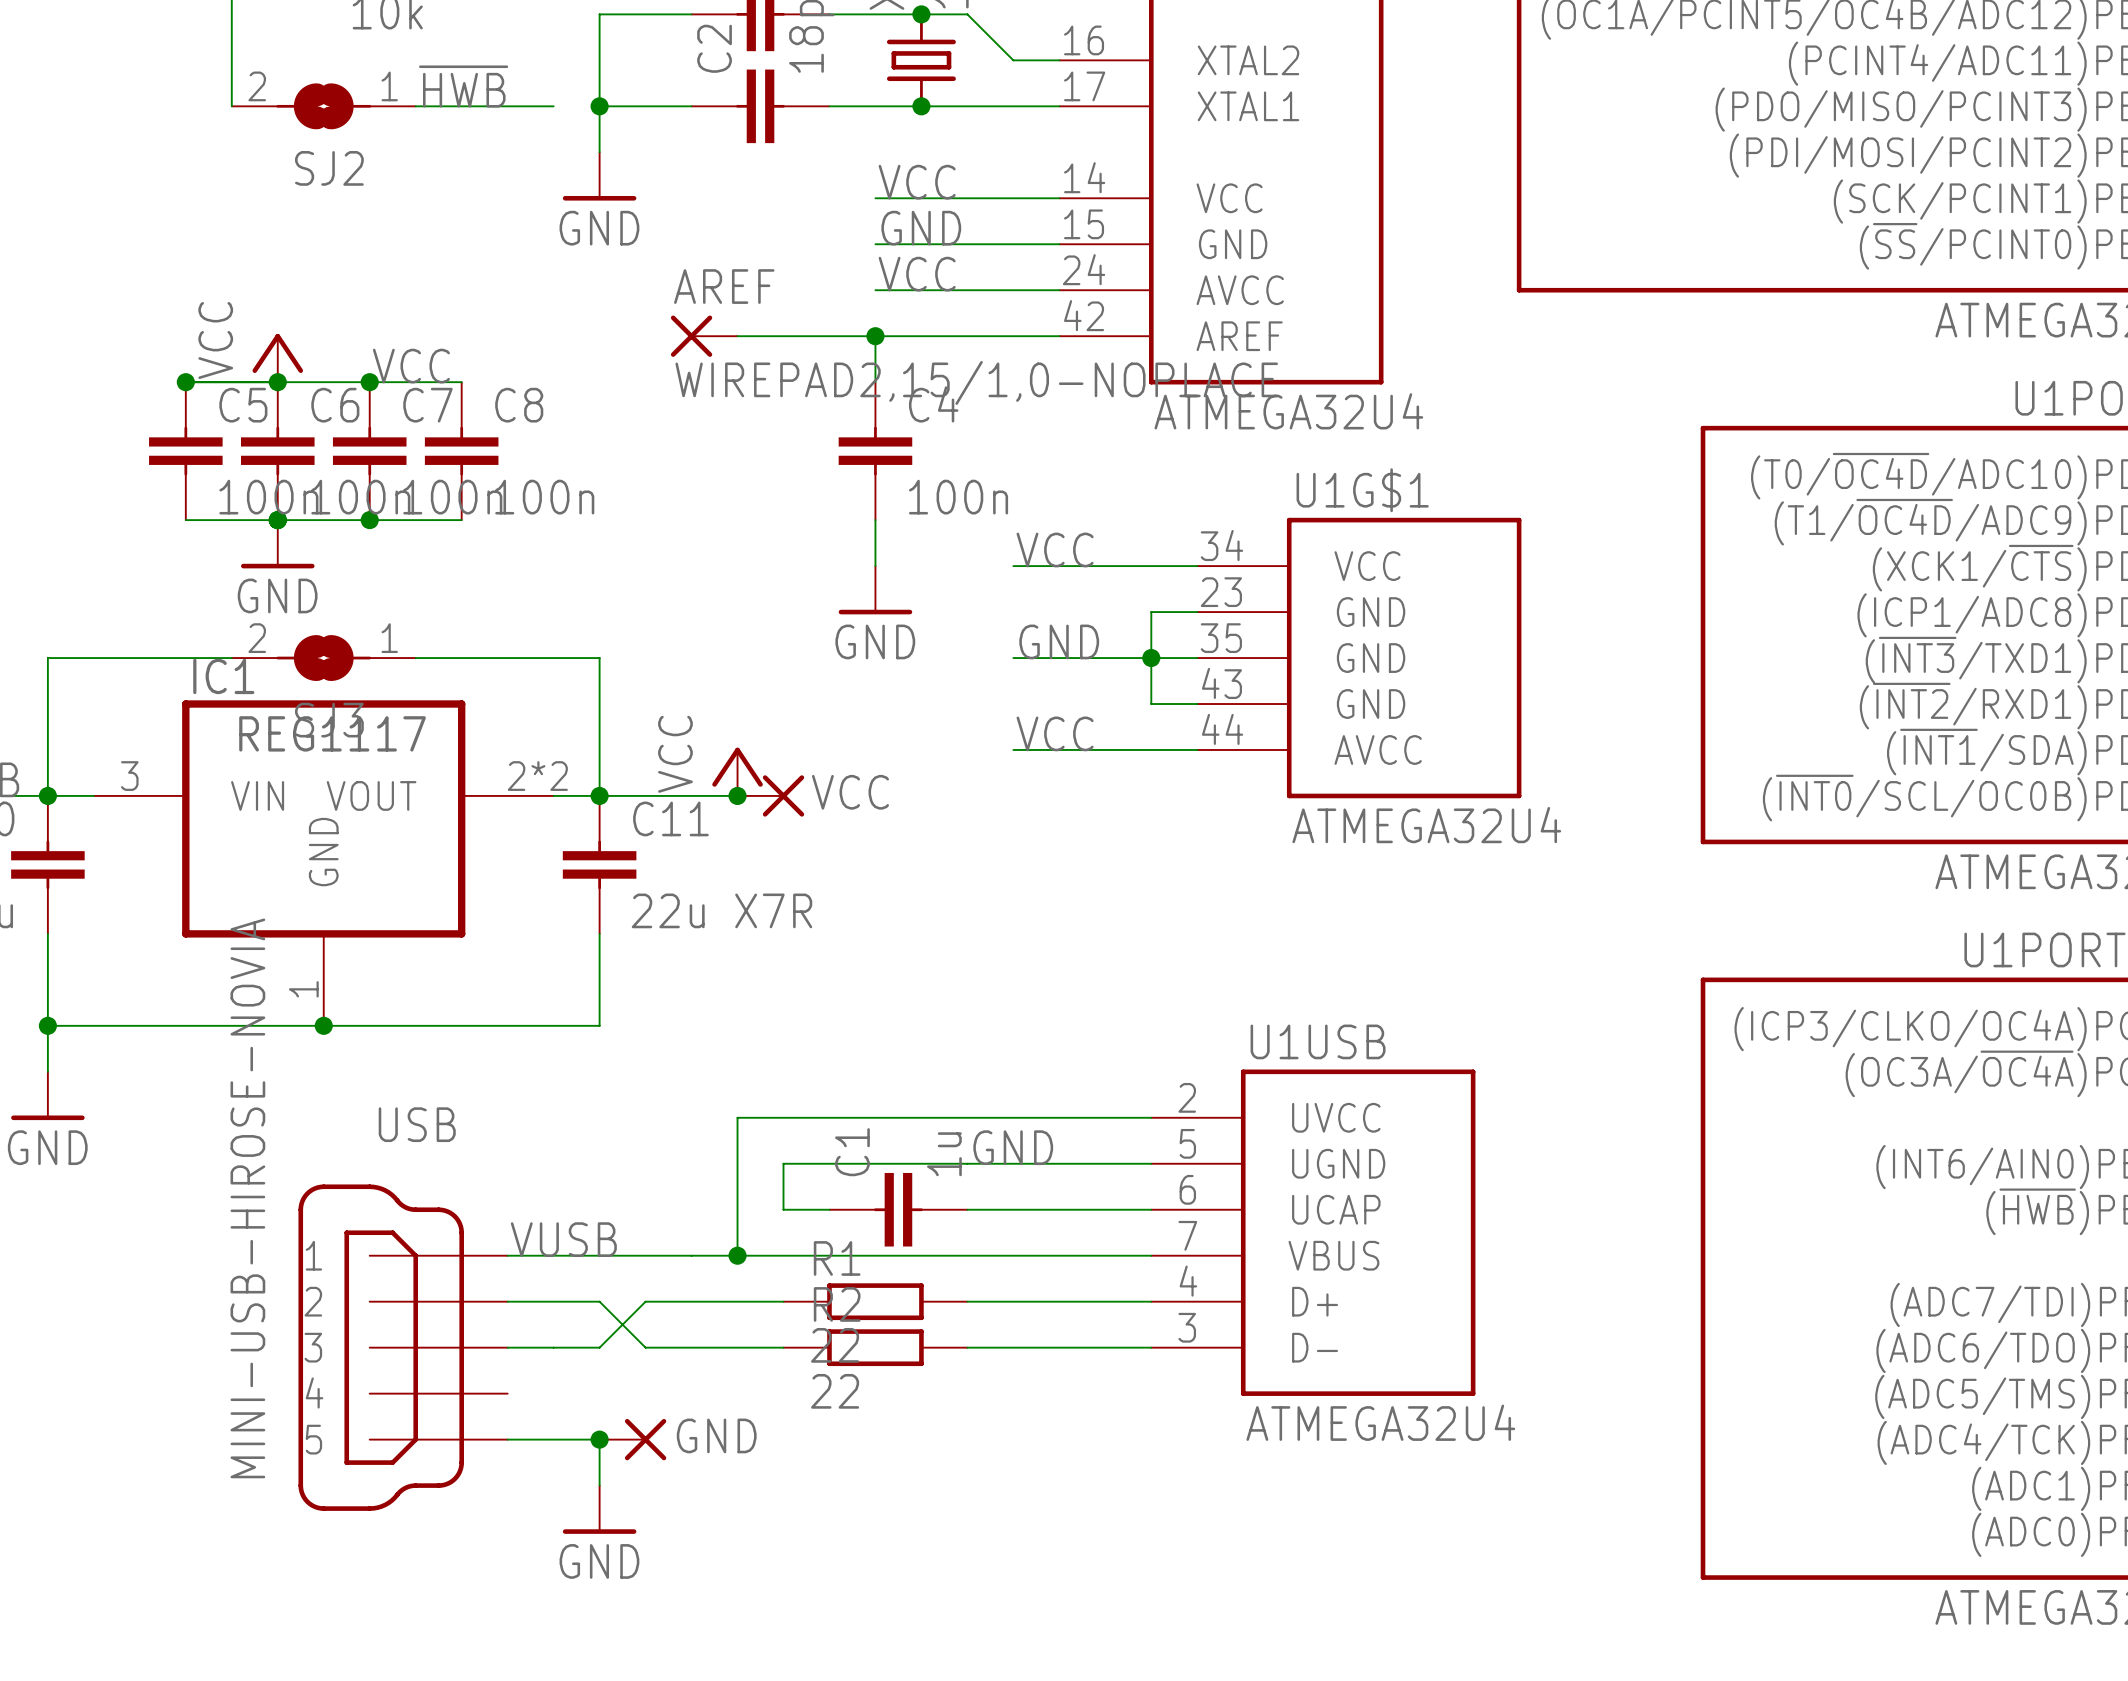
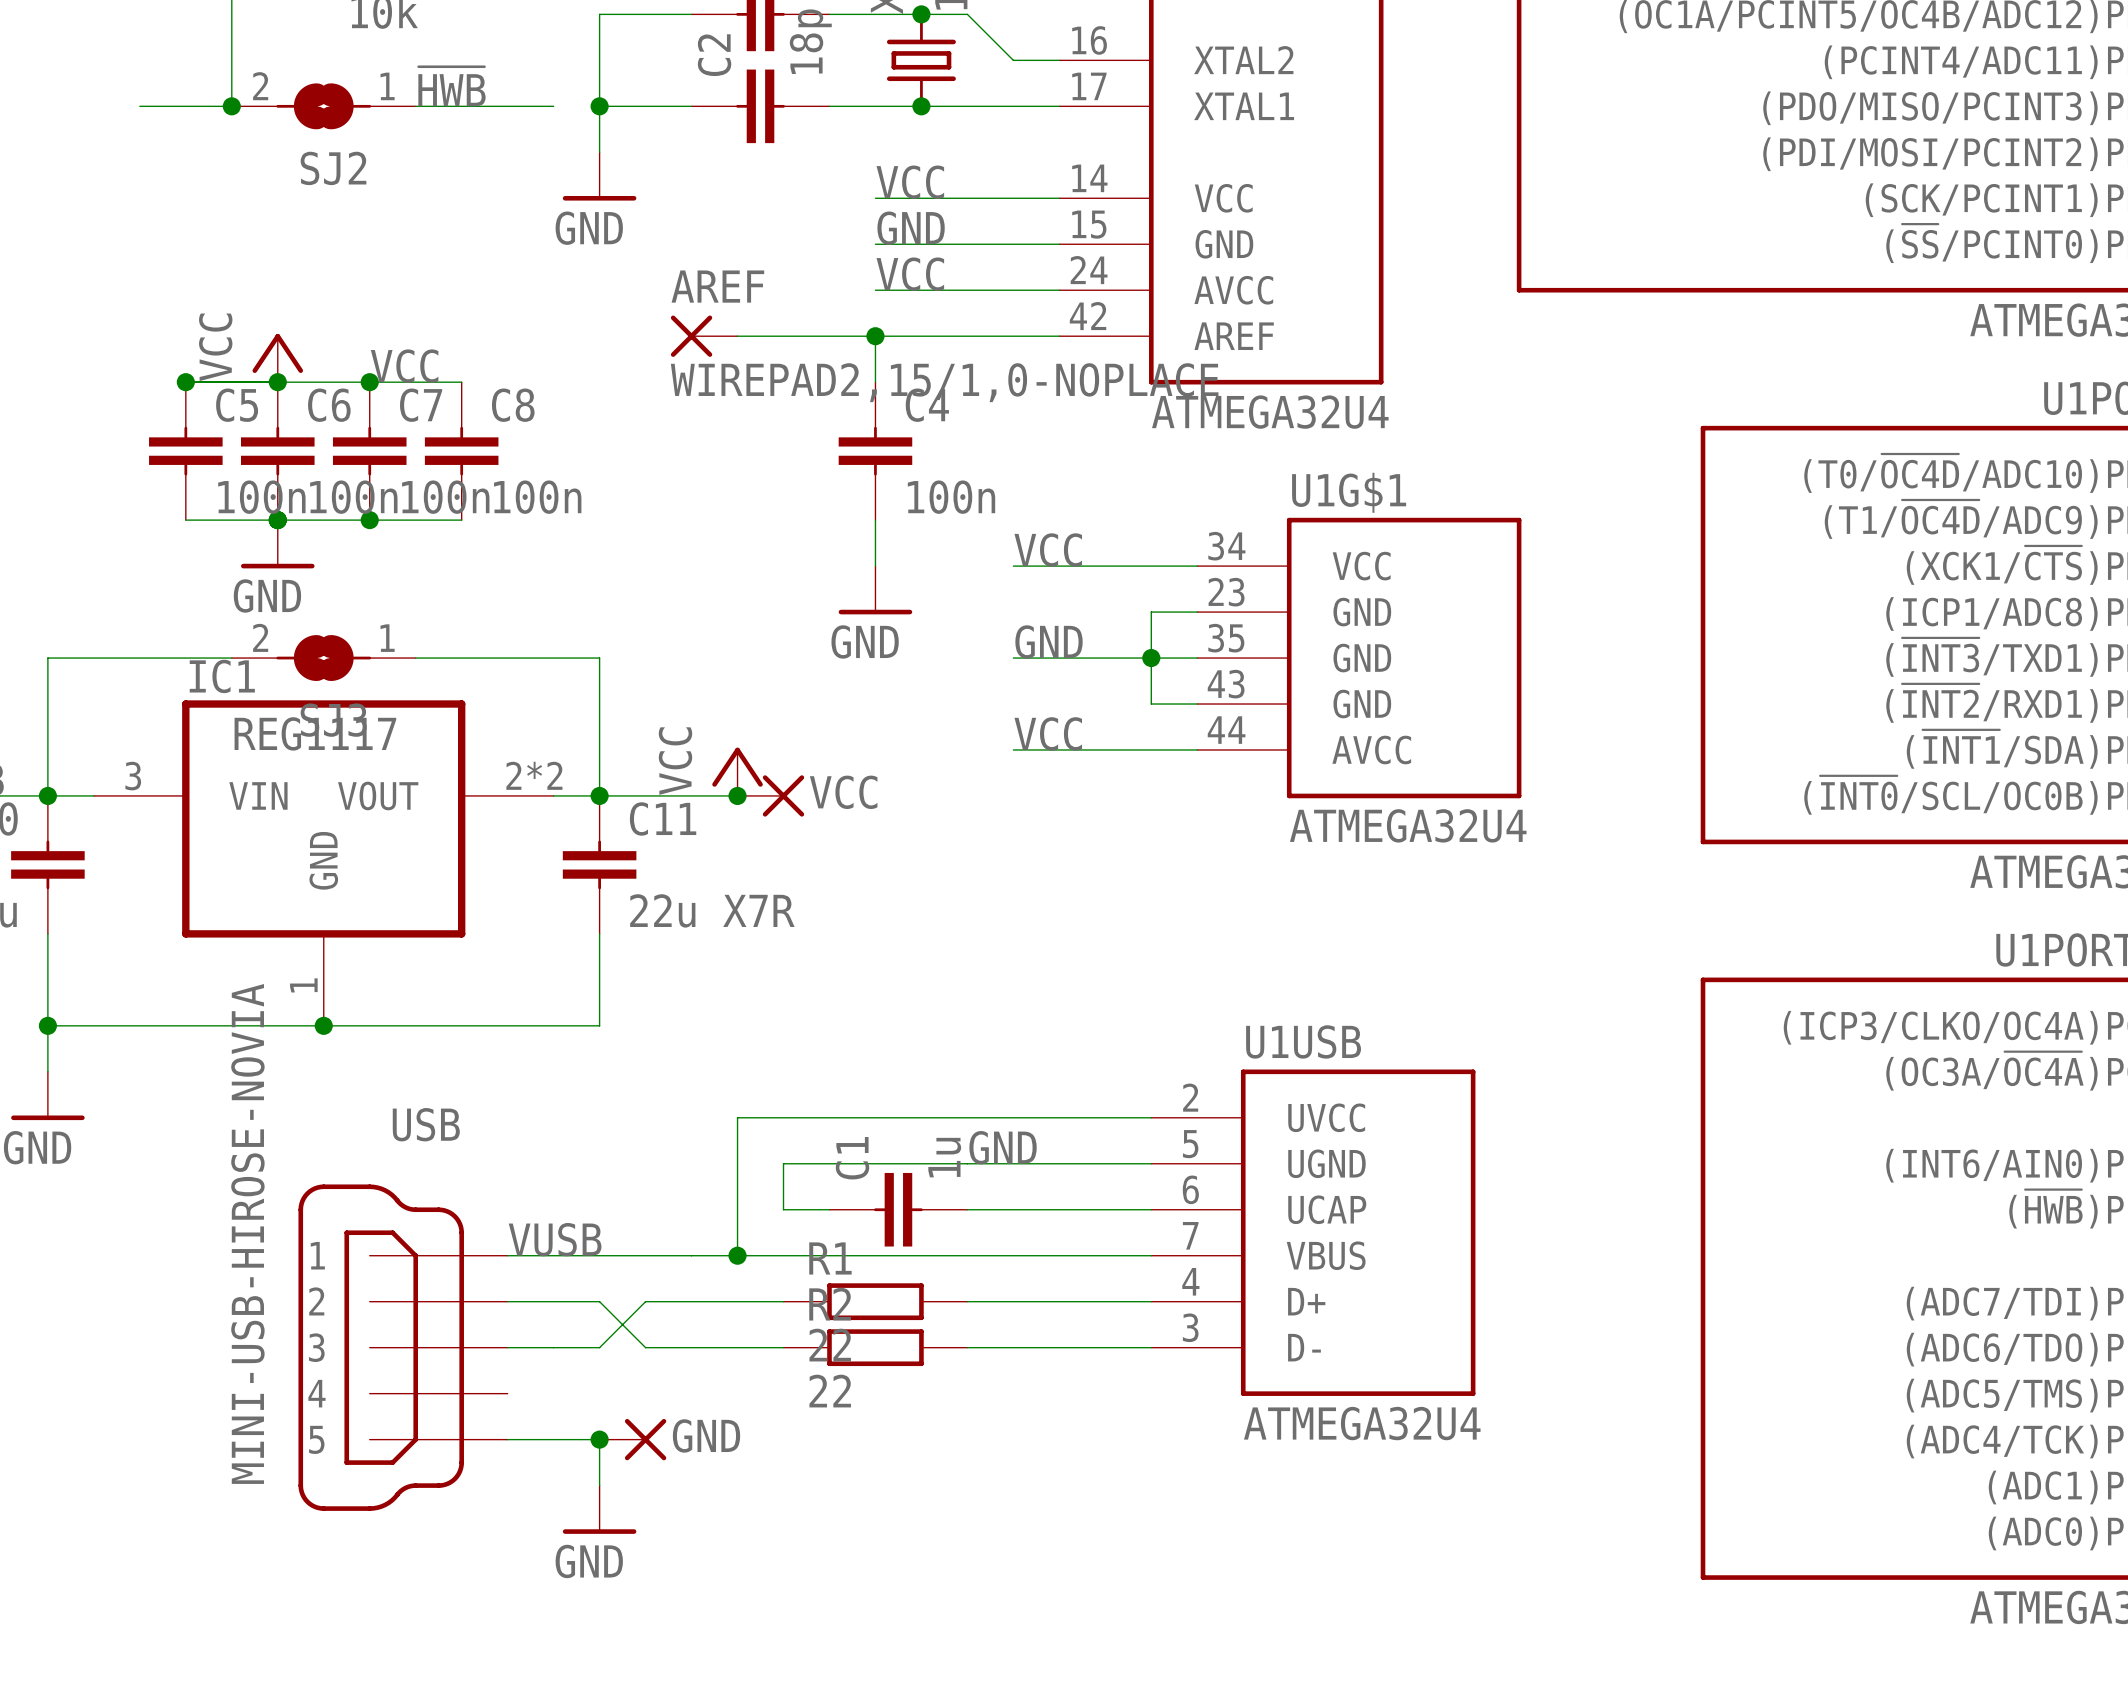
wire: none -> (139, 106) (231, 106)
junction: none -> (231, 106)

